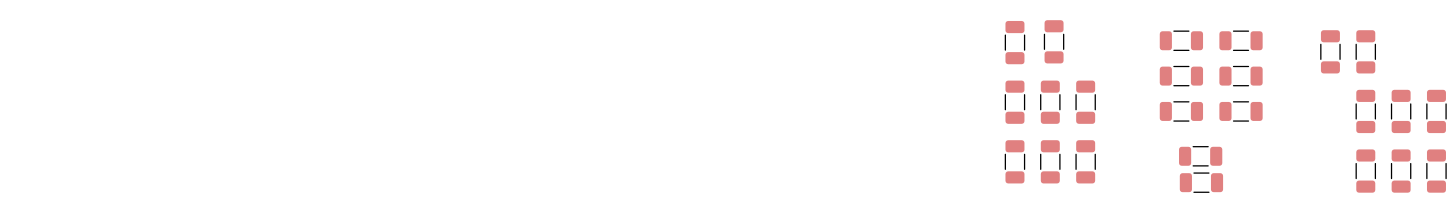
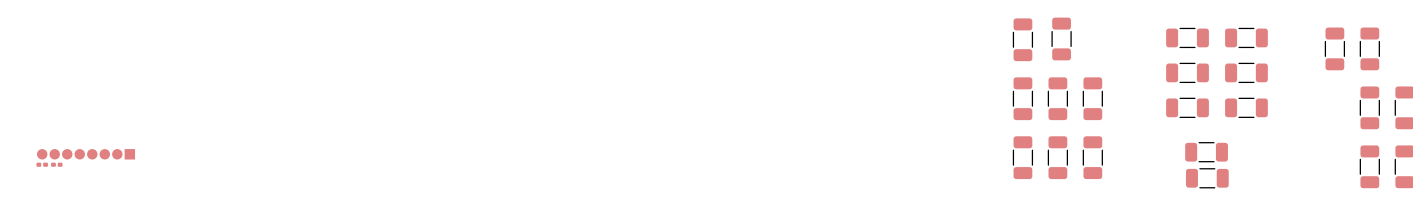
part: none -> (86, 154)
part: none -> (42, 164)
part: none -> (56, 164)

